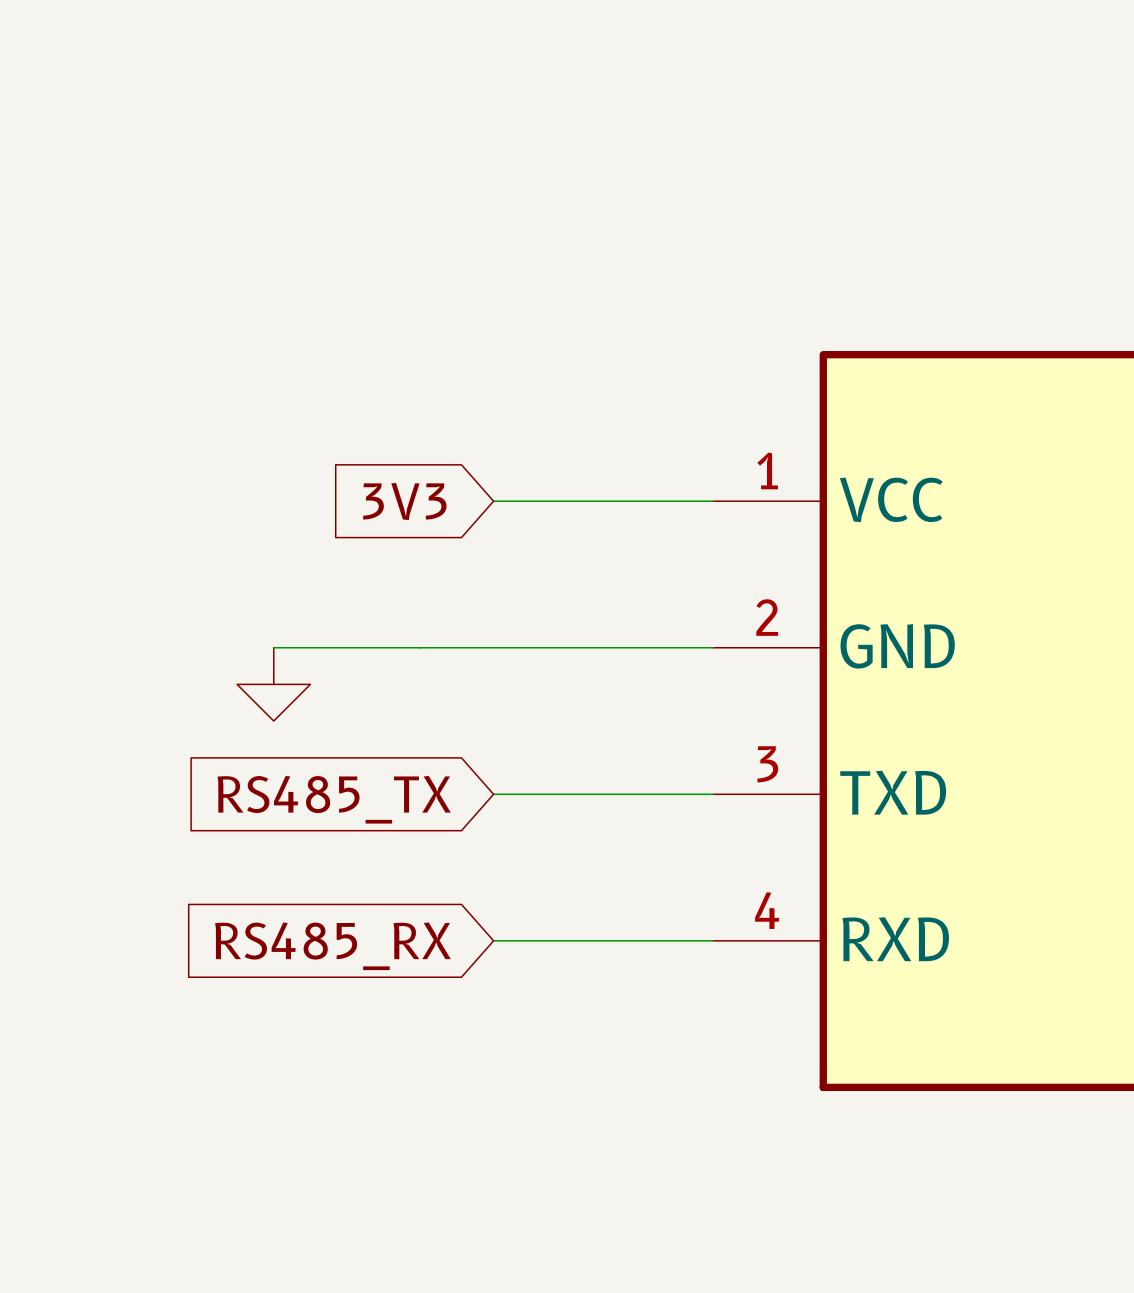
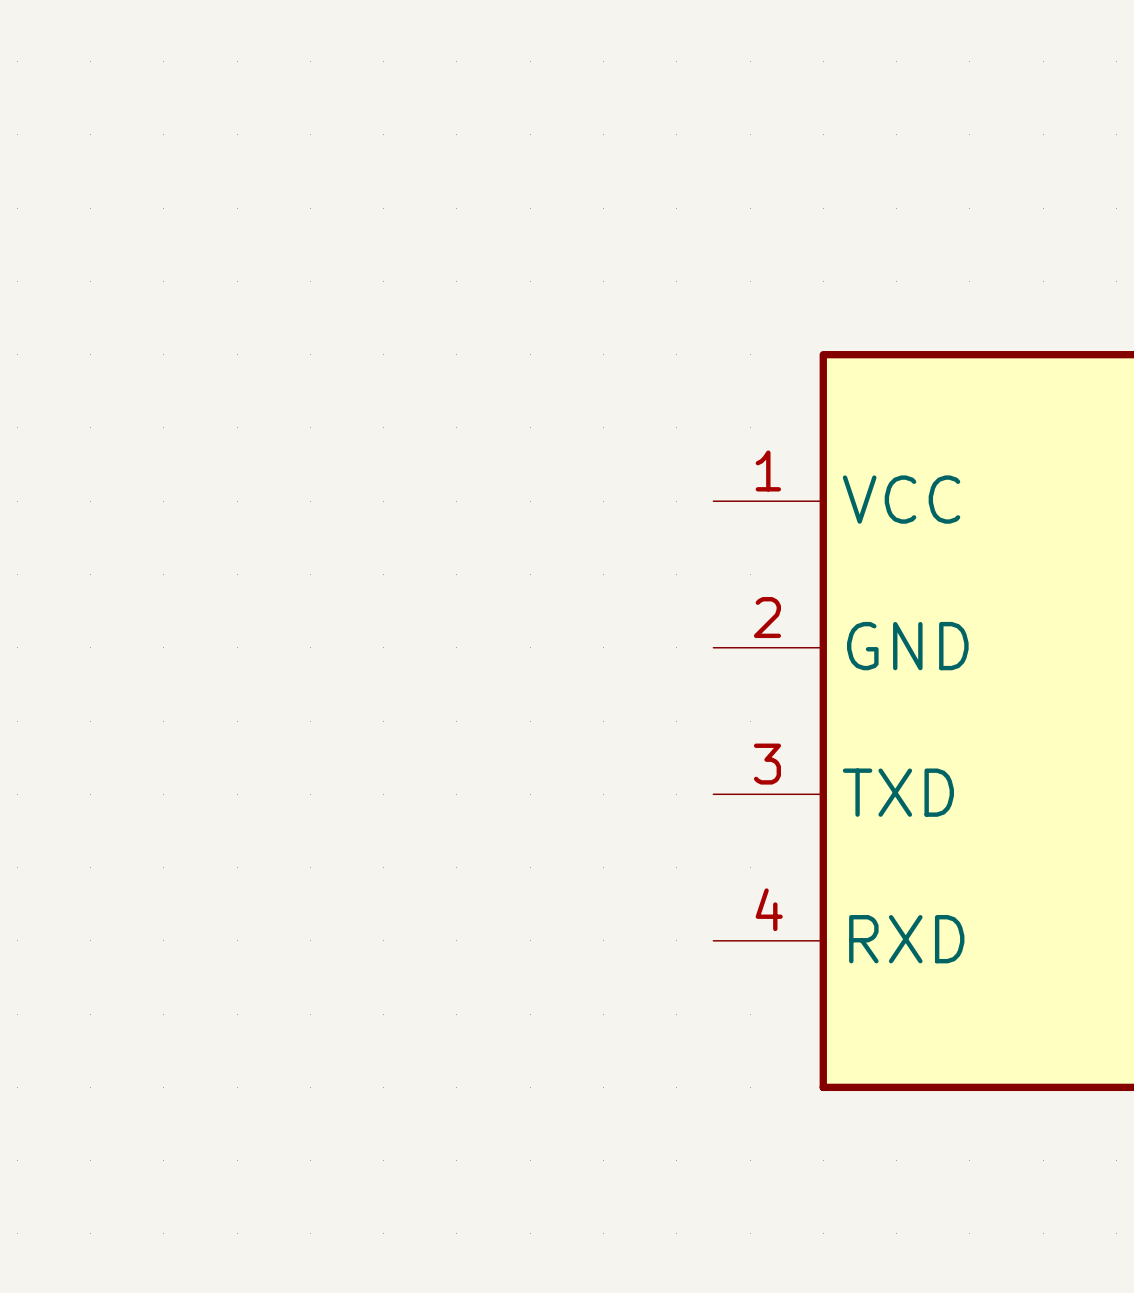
global label: 3V3 (404, 501) -> none
wire: (493, 501) (713, 501) -> none
wire: (273, 647) (713, 647) -> none
power symbol: (273, 684) -> none
wire: (493, 794) (713, 794) -> none
global label: RS485_TX (334, 799) -> none
wire: (493, 940) (713, 940) -> none
global label: RS485_RX (332, 946) -> none

